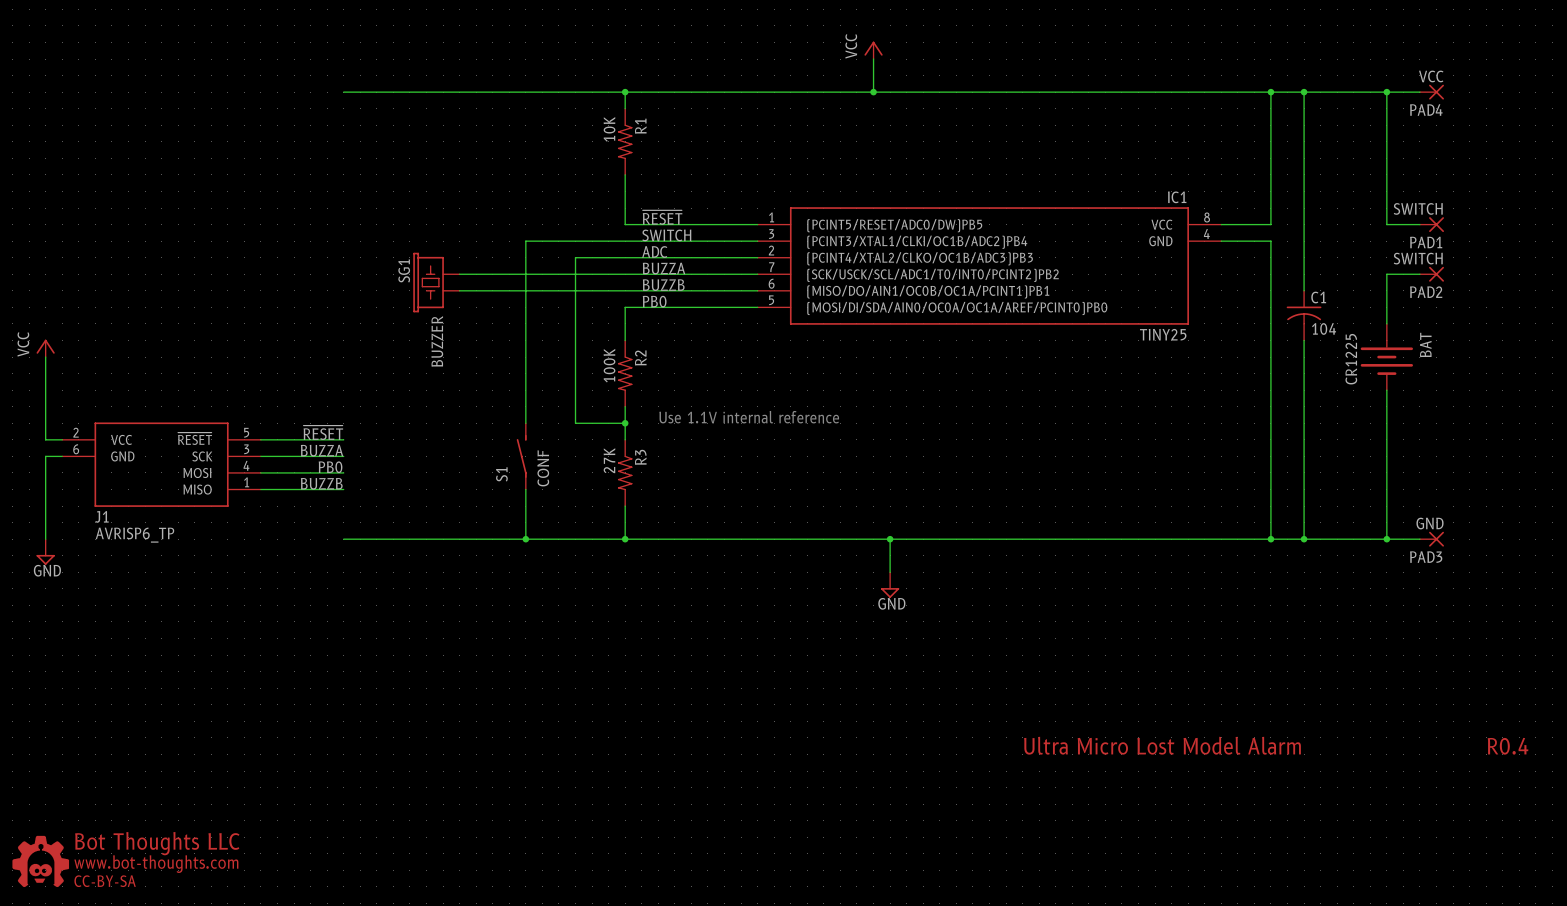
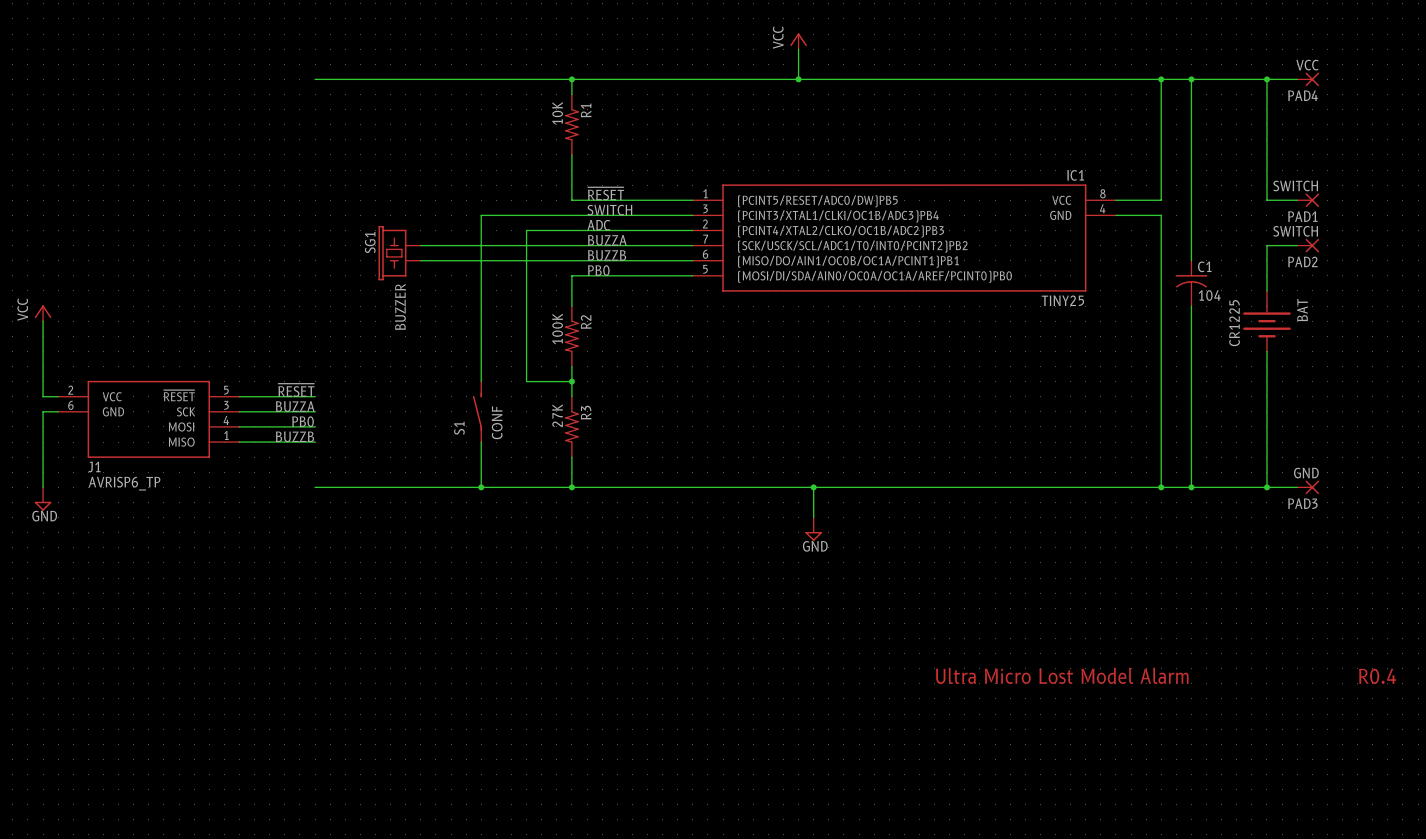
IC1 pin name: (PCINT3/XTAL1/CLKI/OC1B/ADC2)PB4 (917, 242) -> (PCINT3/XTAL1/CLKI/OC1B/ADC3)PB4 (838, 216)
IC1 pin name: (PCINT4/XTAL2/CLKO/OC1B/ADC3)PB3 (920, 258) -> (PCINT4/XTAL2/CLKO/OC1B/ADC2)PB3 (841, 231)
text: Use 1.1V internal reference (749, 417) -> none
part: (40, 861) -> none

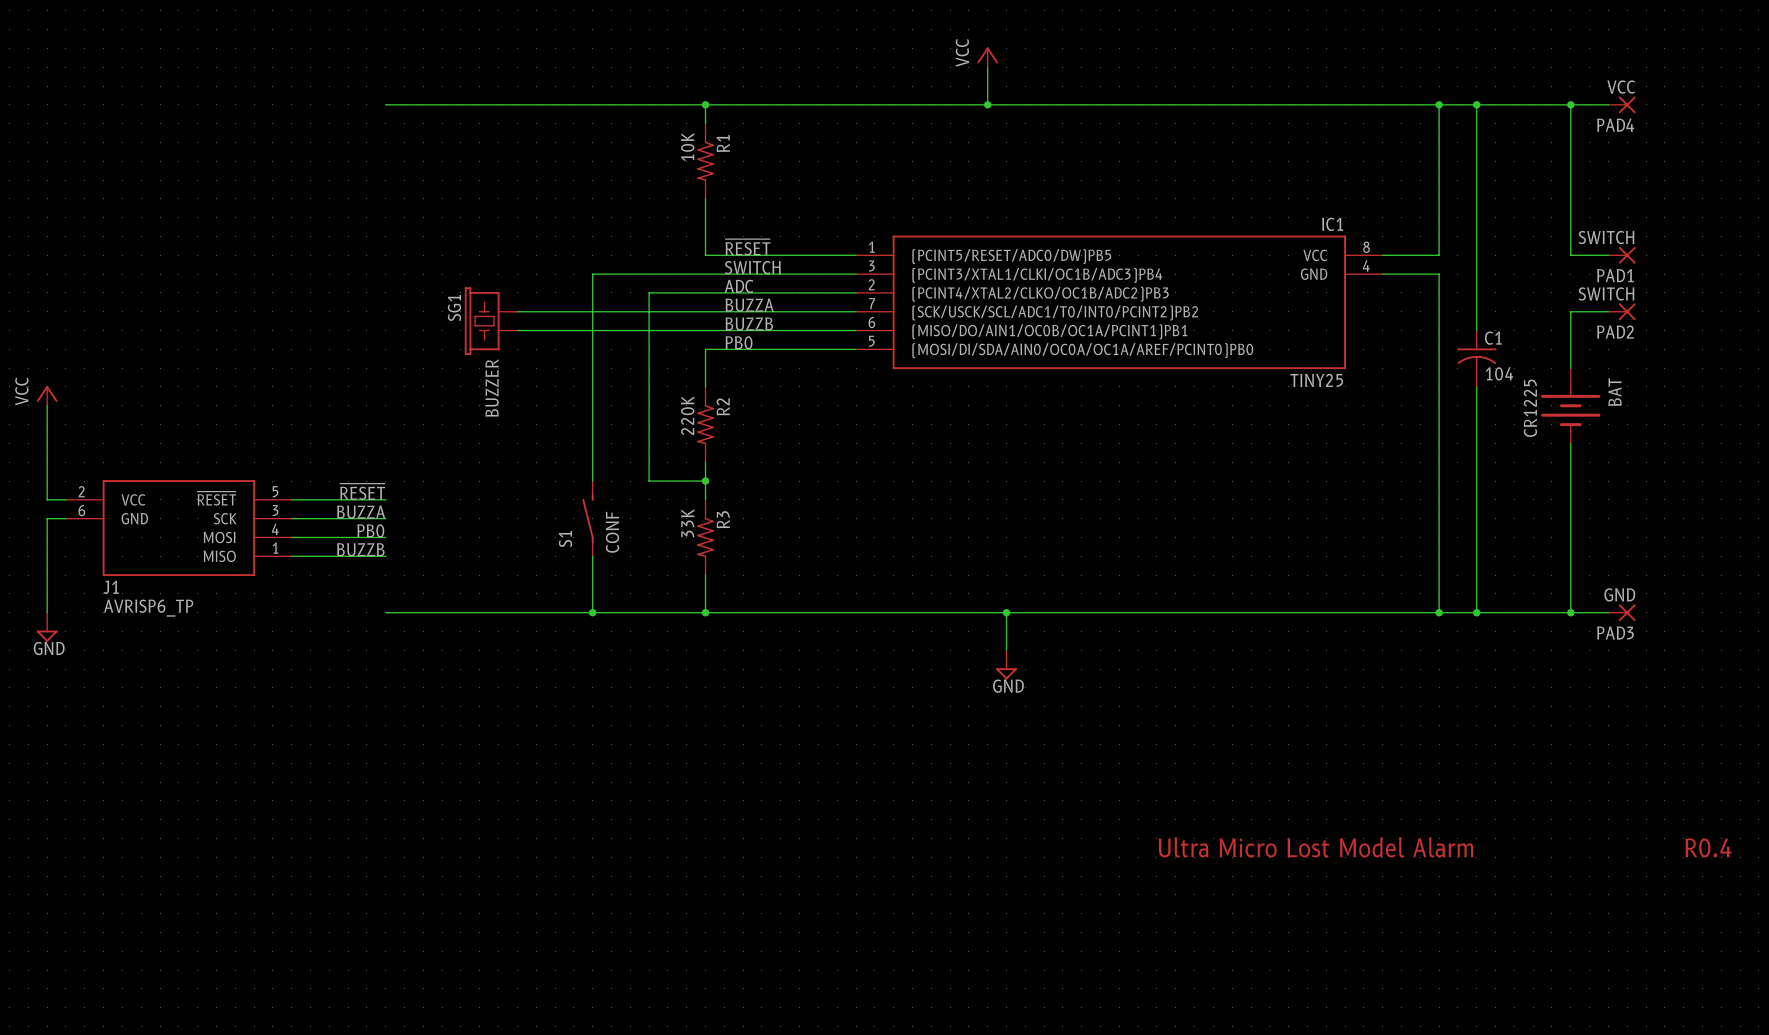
R2 value: 100K (557, 328) -> 220K (687, 415)
R3 value: 27K (557, 415) -> 33K (687, 523)

